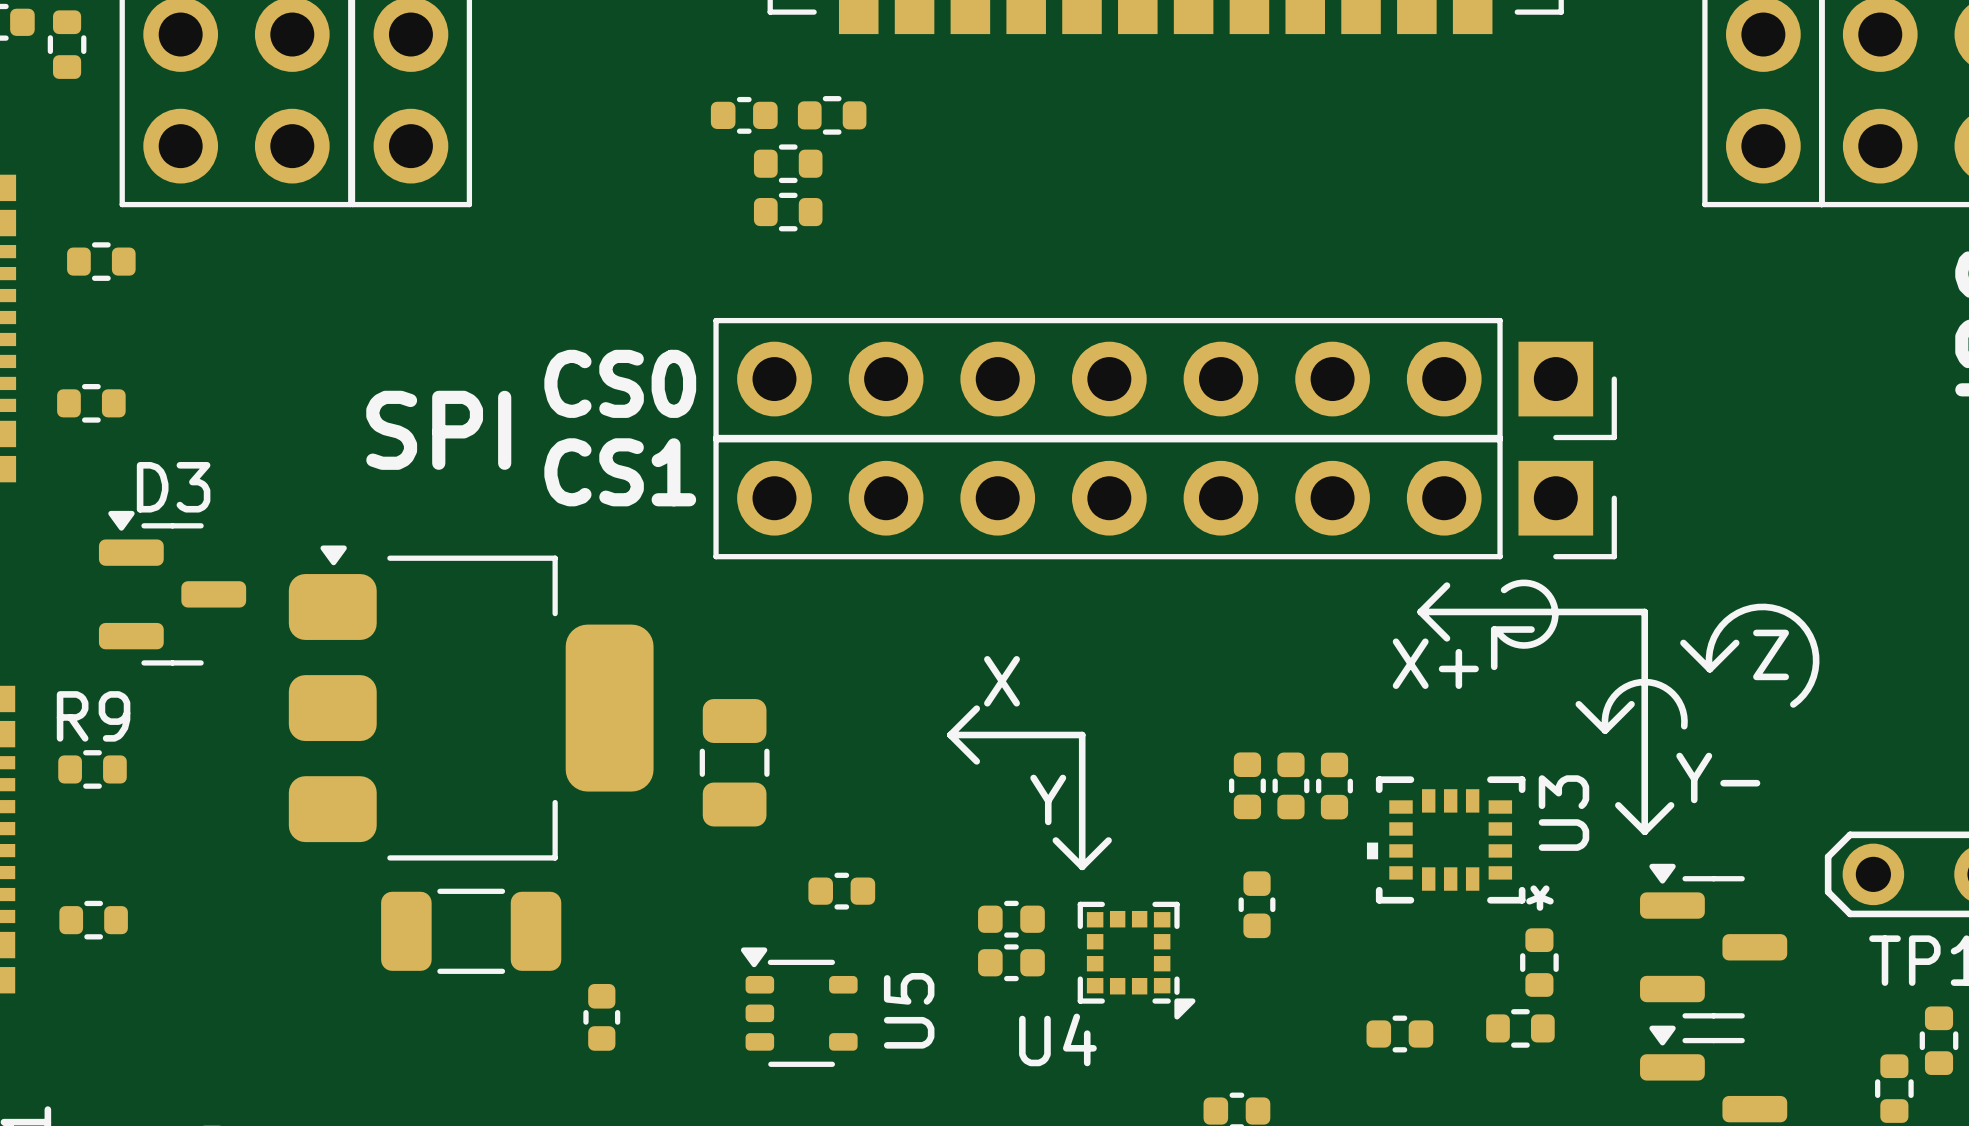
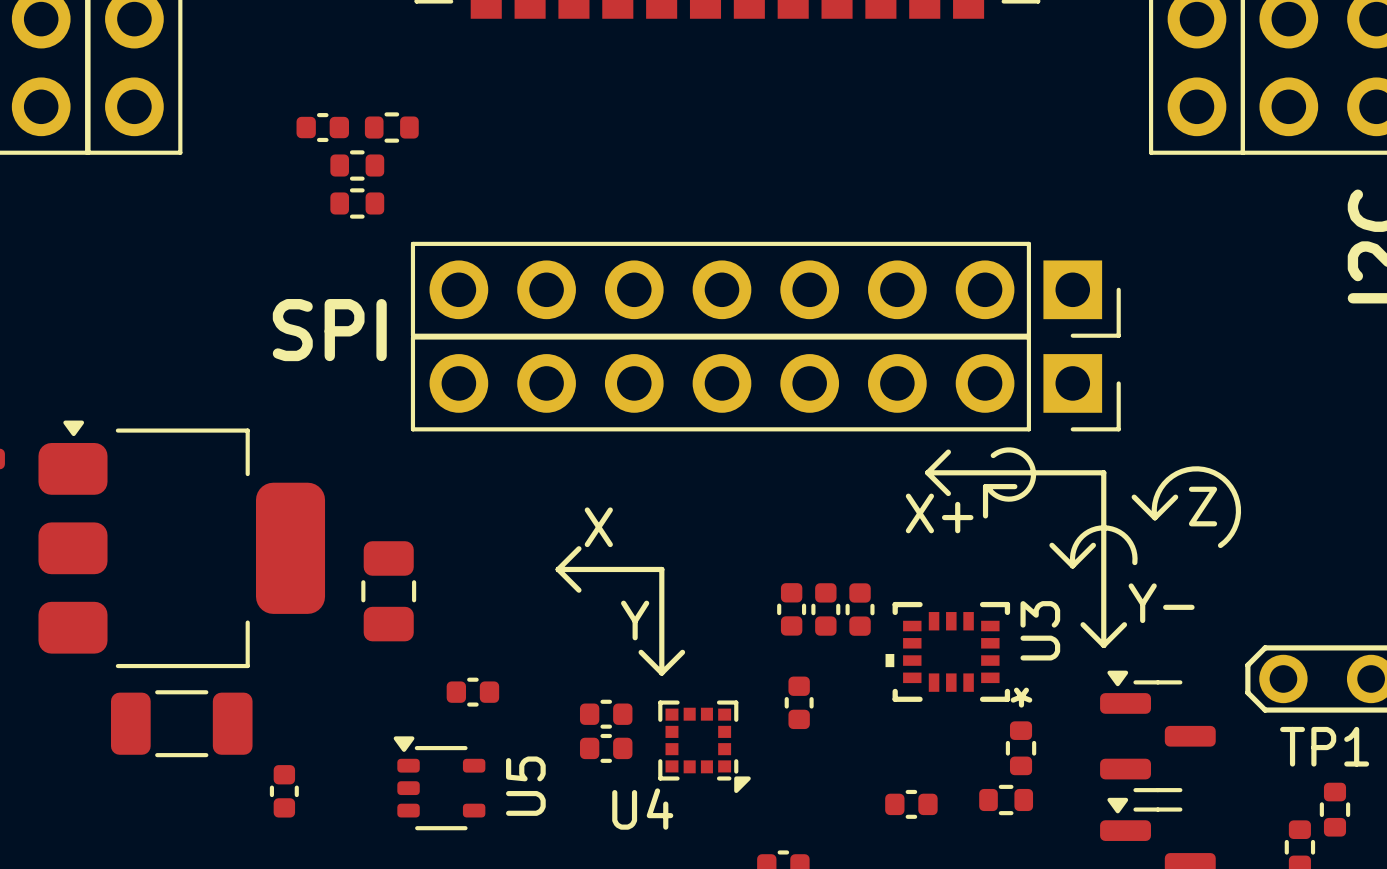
part position: (744, 115) -> (322, 127)
part: (832, 115) -> none
part: (788, 163) -> none
part: none -> (391, 127)
part: (788, 212) -> none
part: none -> (357, 165)
part: none -> (357, 203)
part position: (1165, 379) -> (765, 289)
text: CS0 (620, 383) -> none
text position: SPI (438, 430) -> SPI (329, 330)
text: CS1 (620, 472) -> none
part position: (1165, 498) -> (765, 383)

